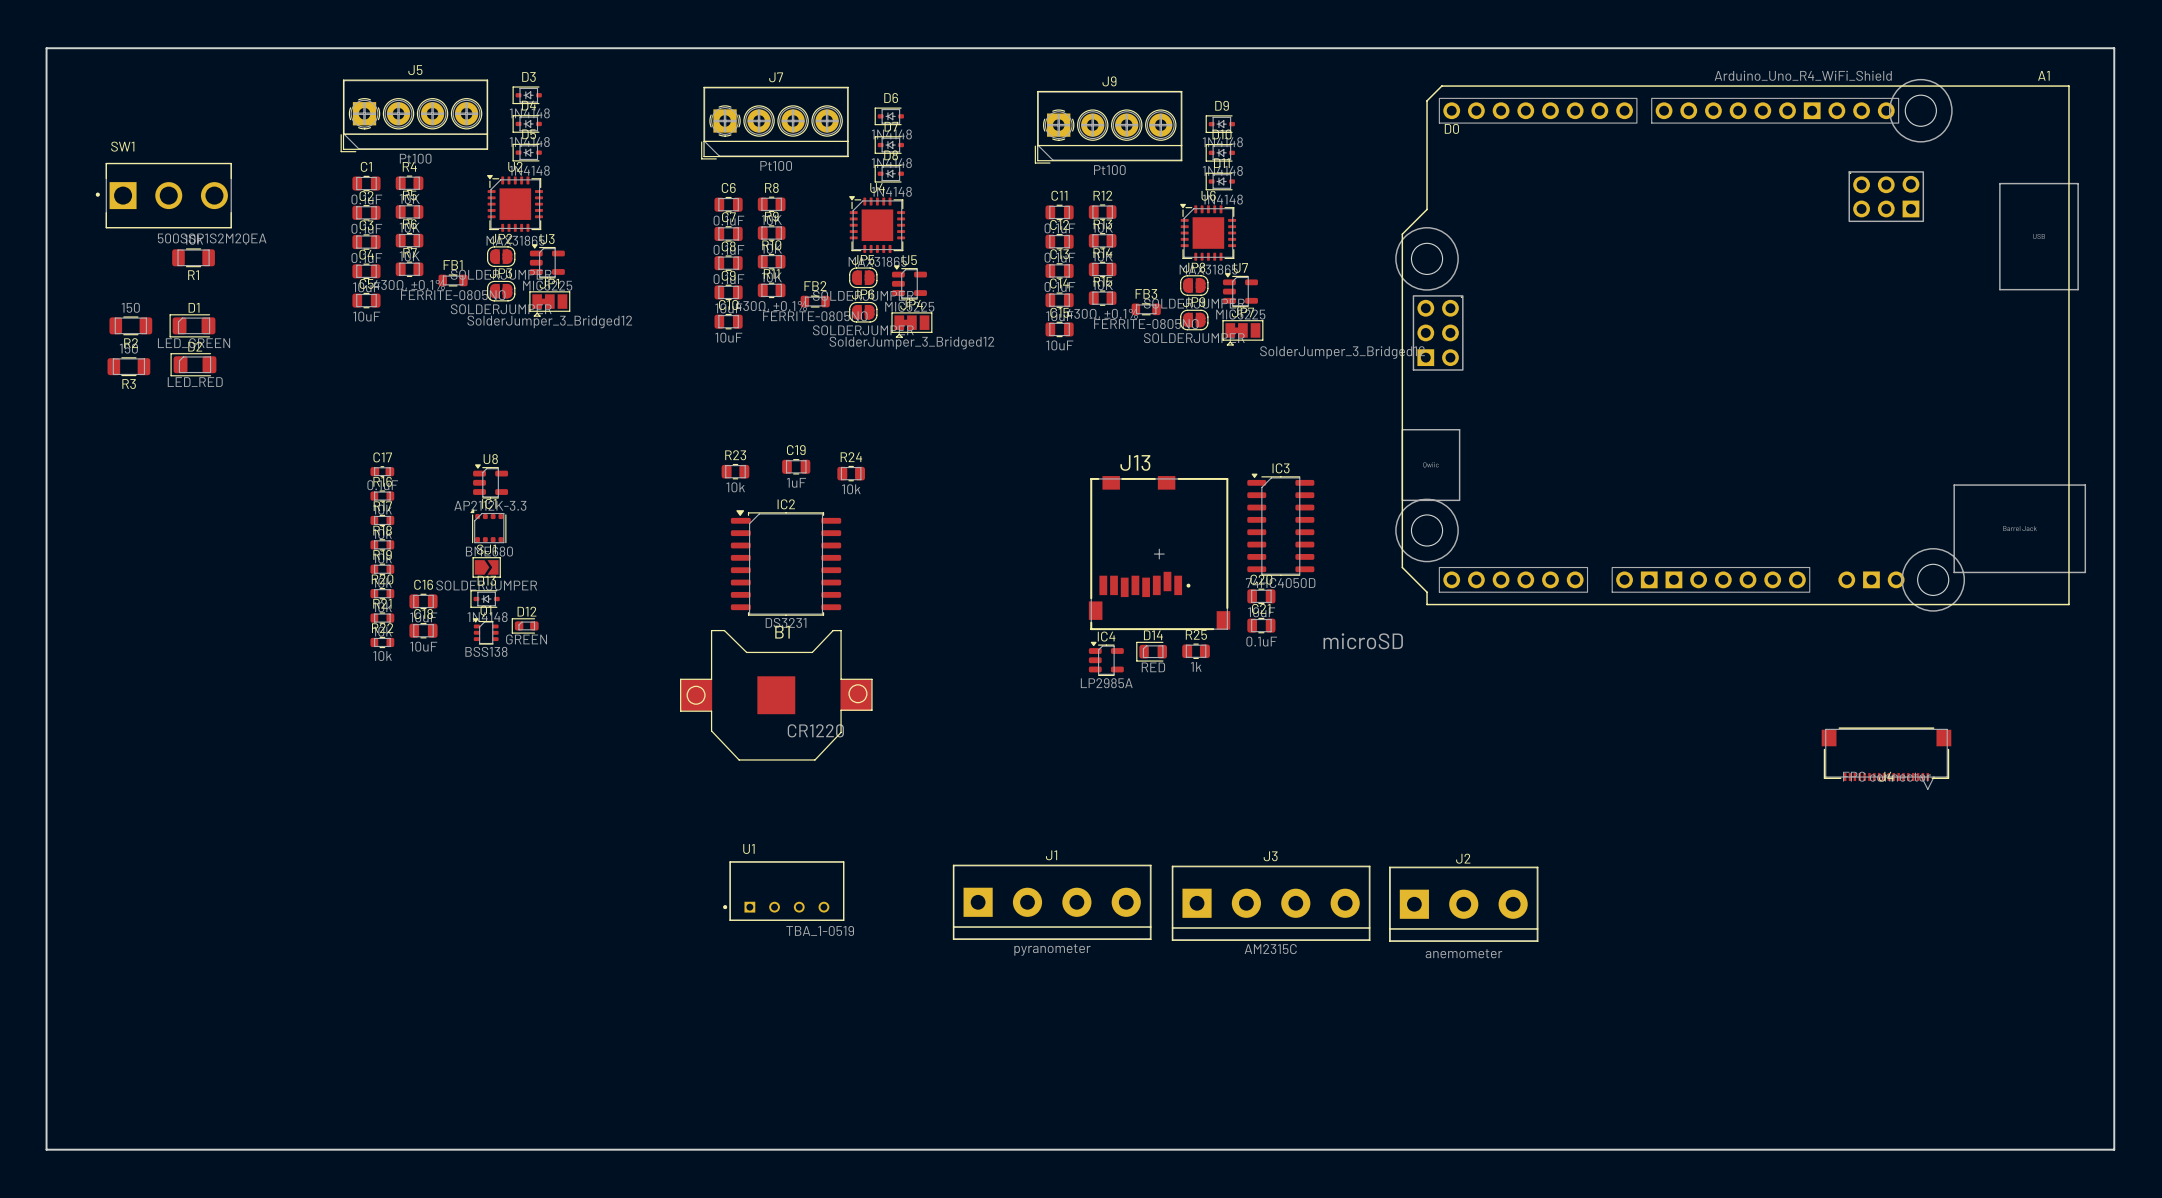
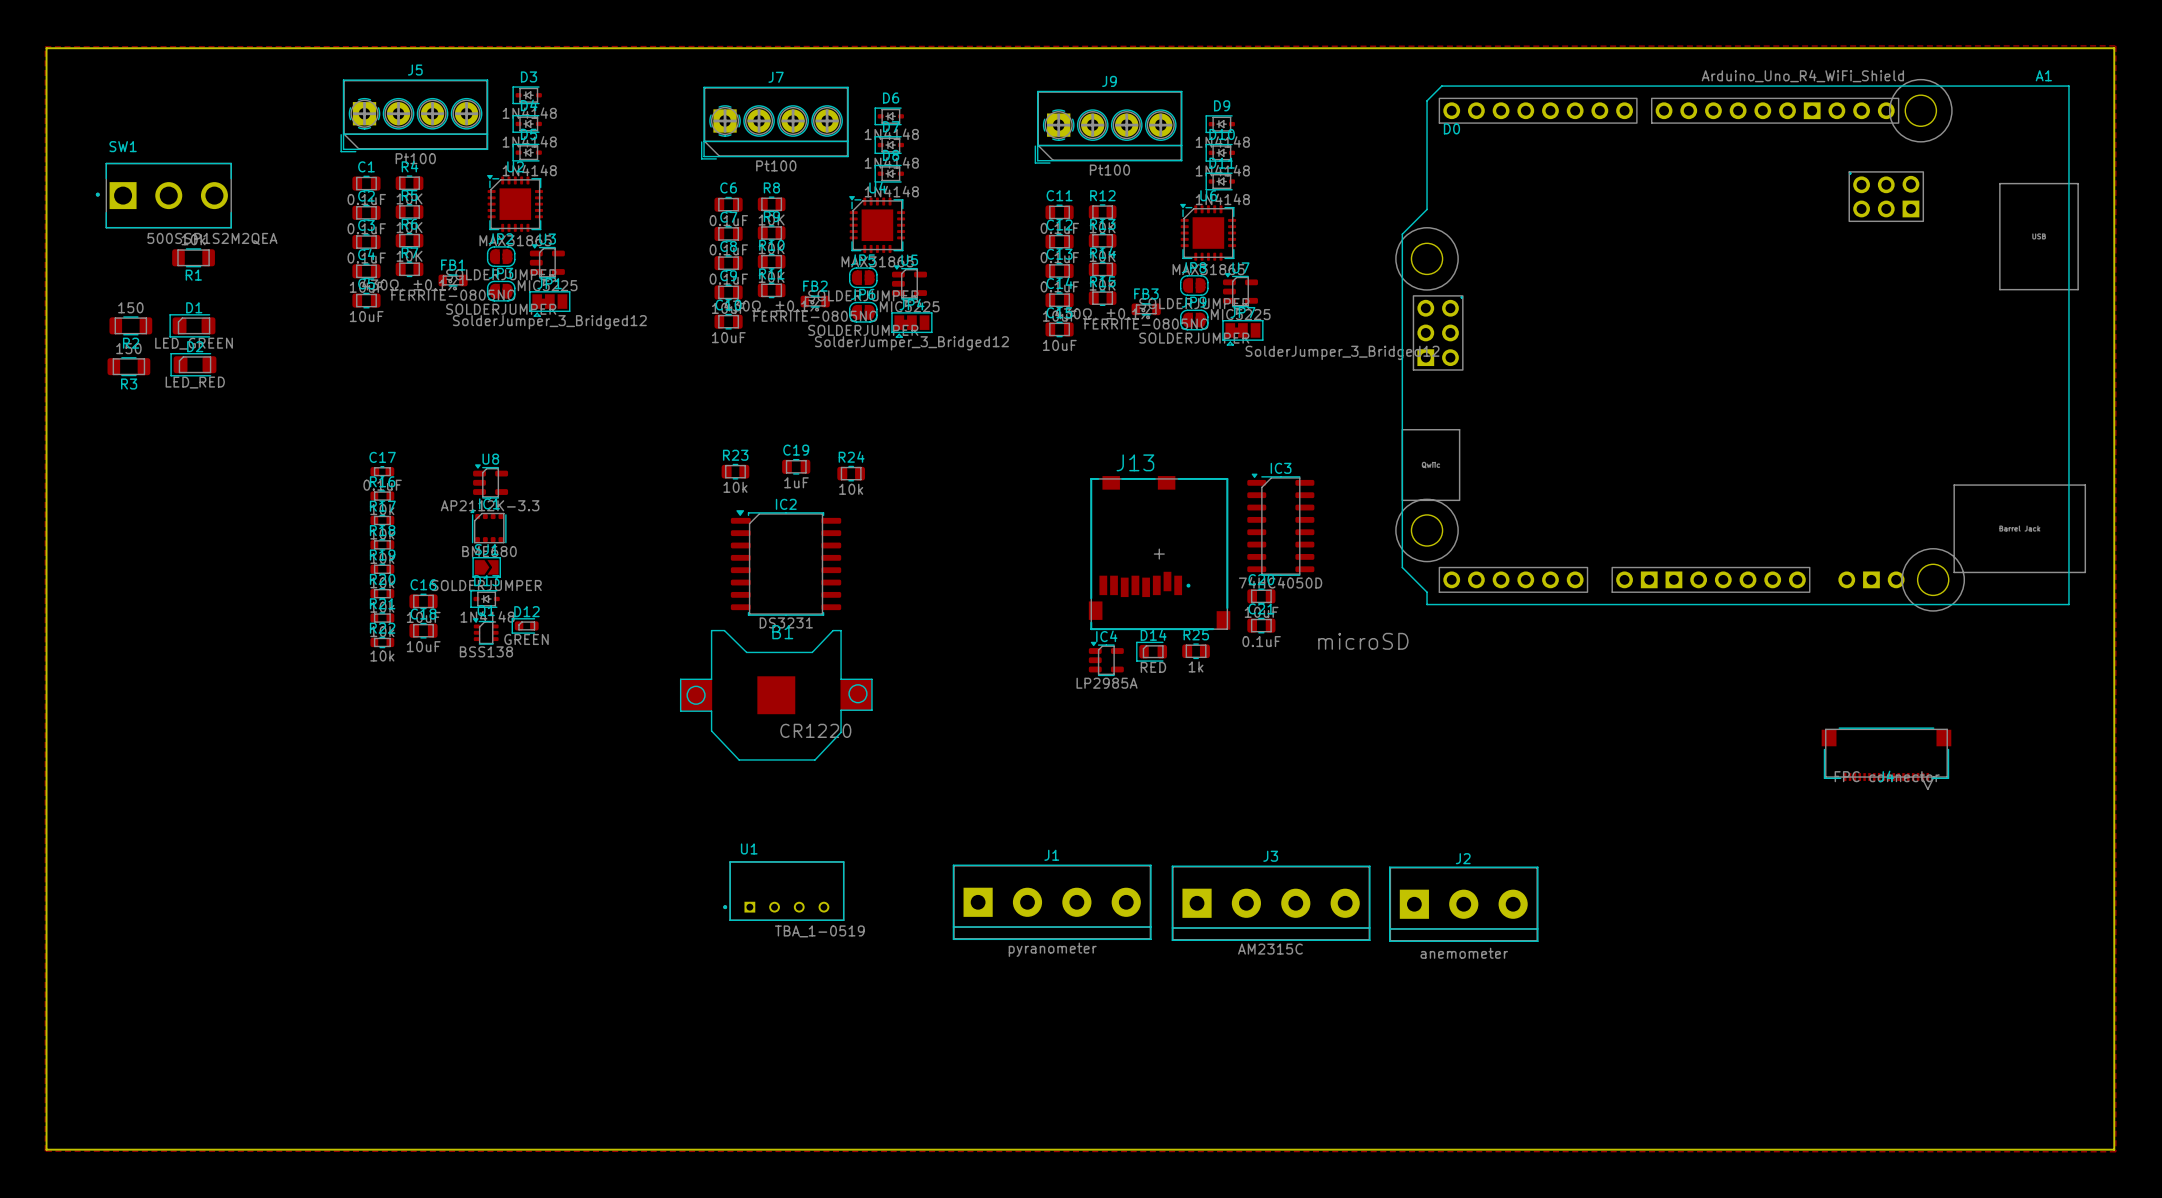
zone outline: none -> (2115, 45) (45, 46) (45, 1151) (2115, 1151) (2115, 45)

